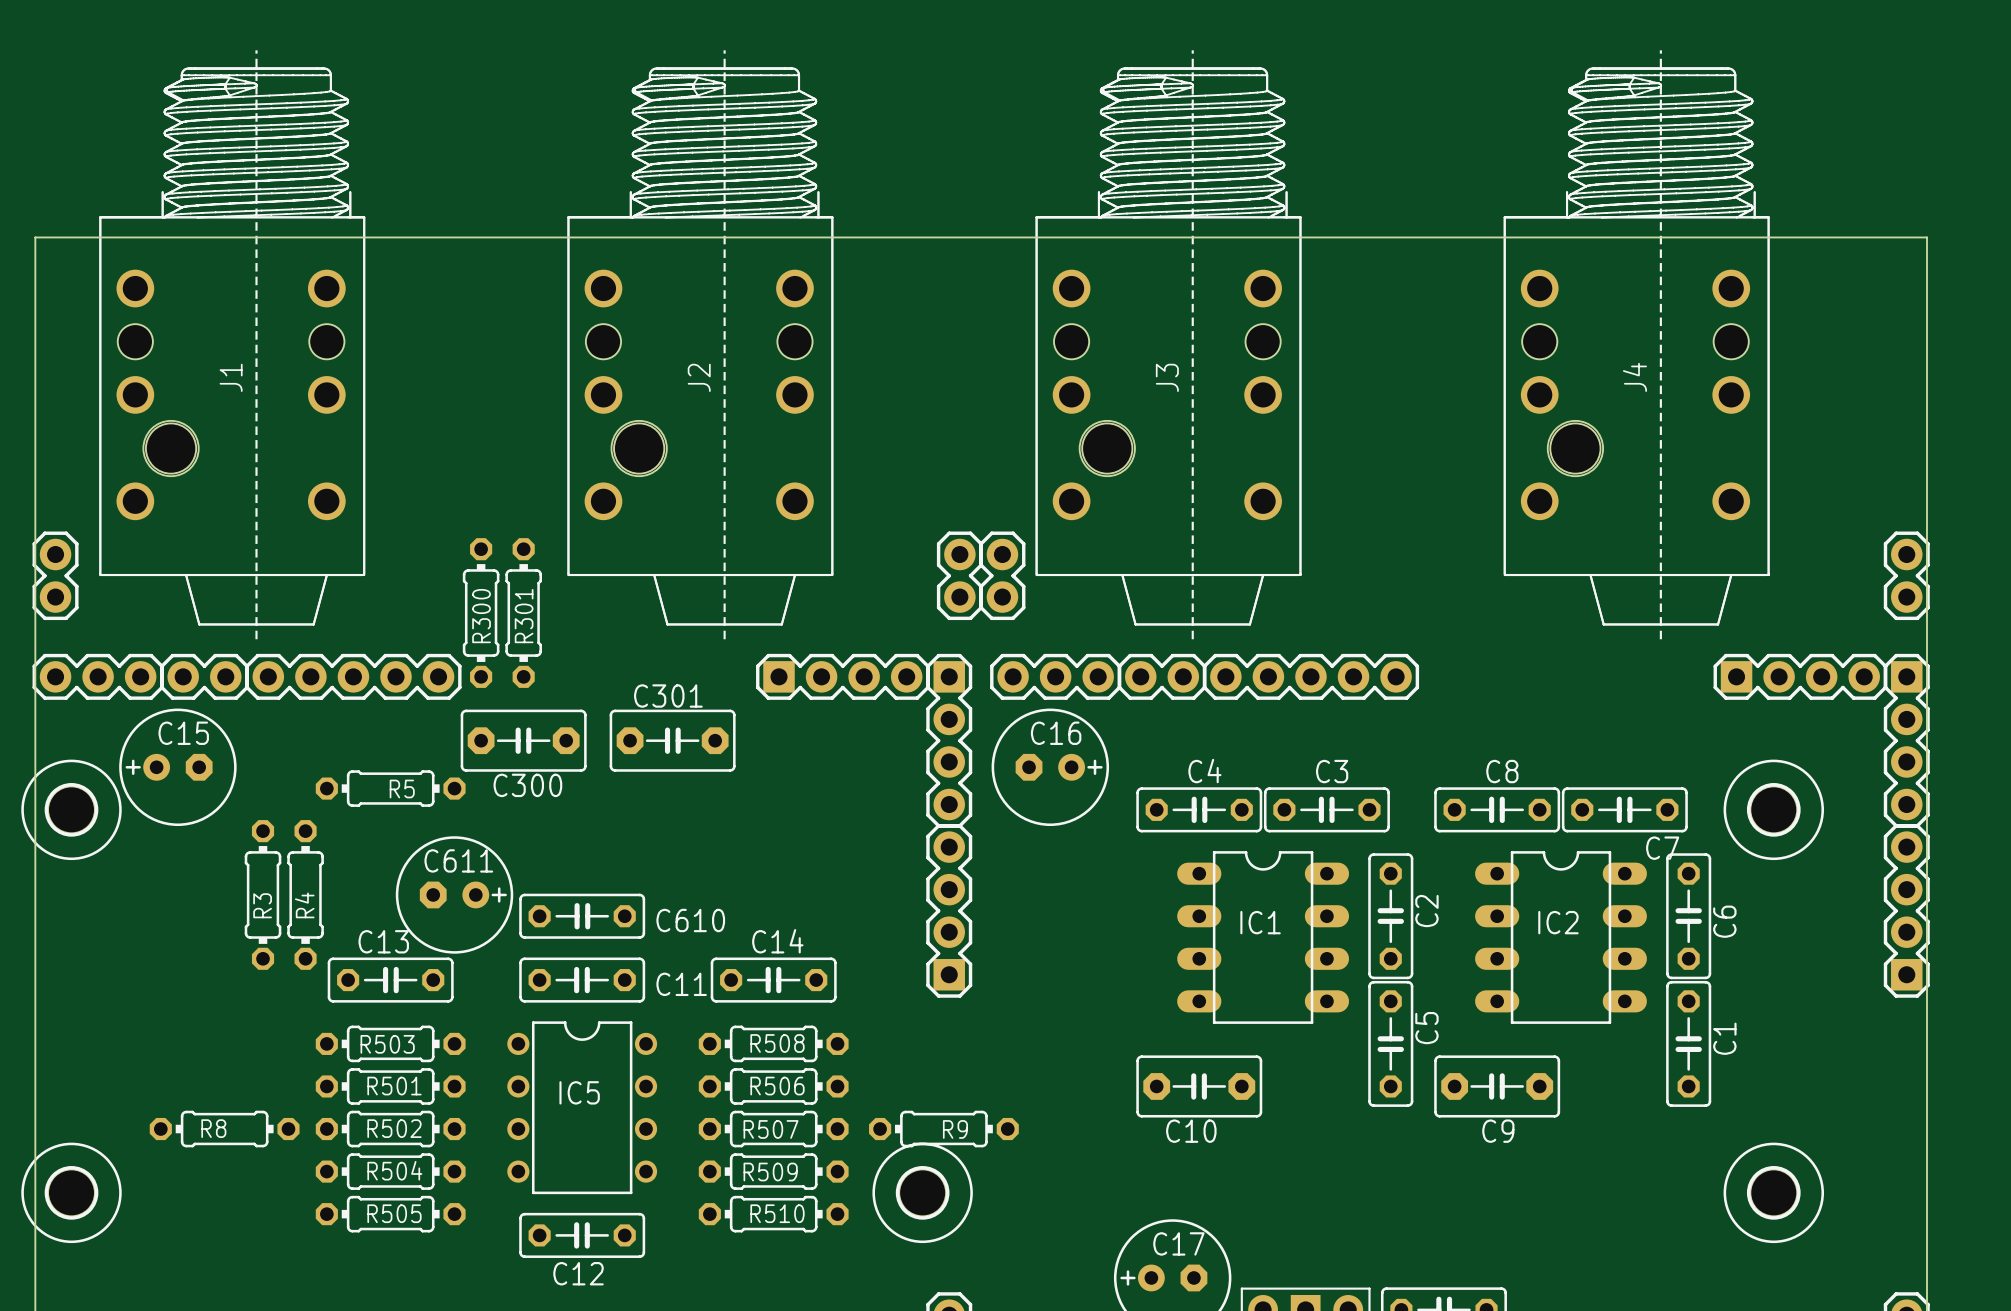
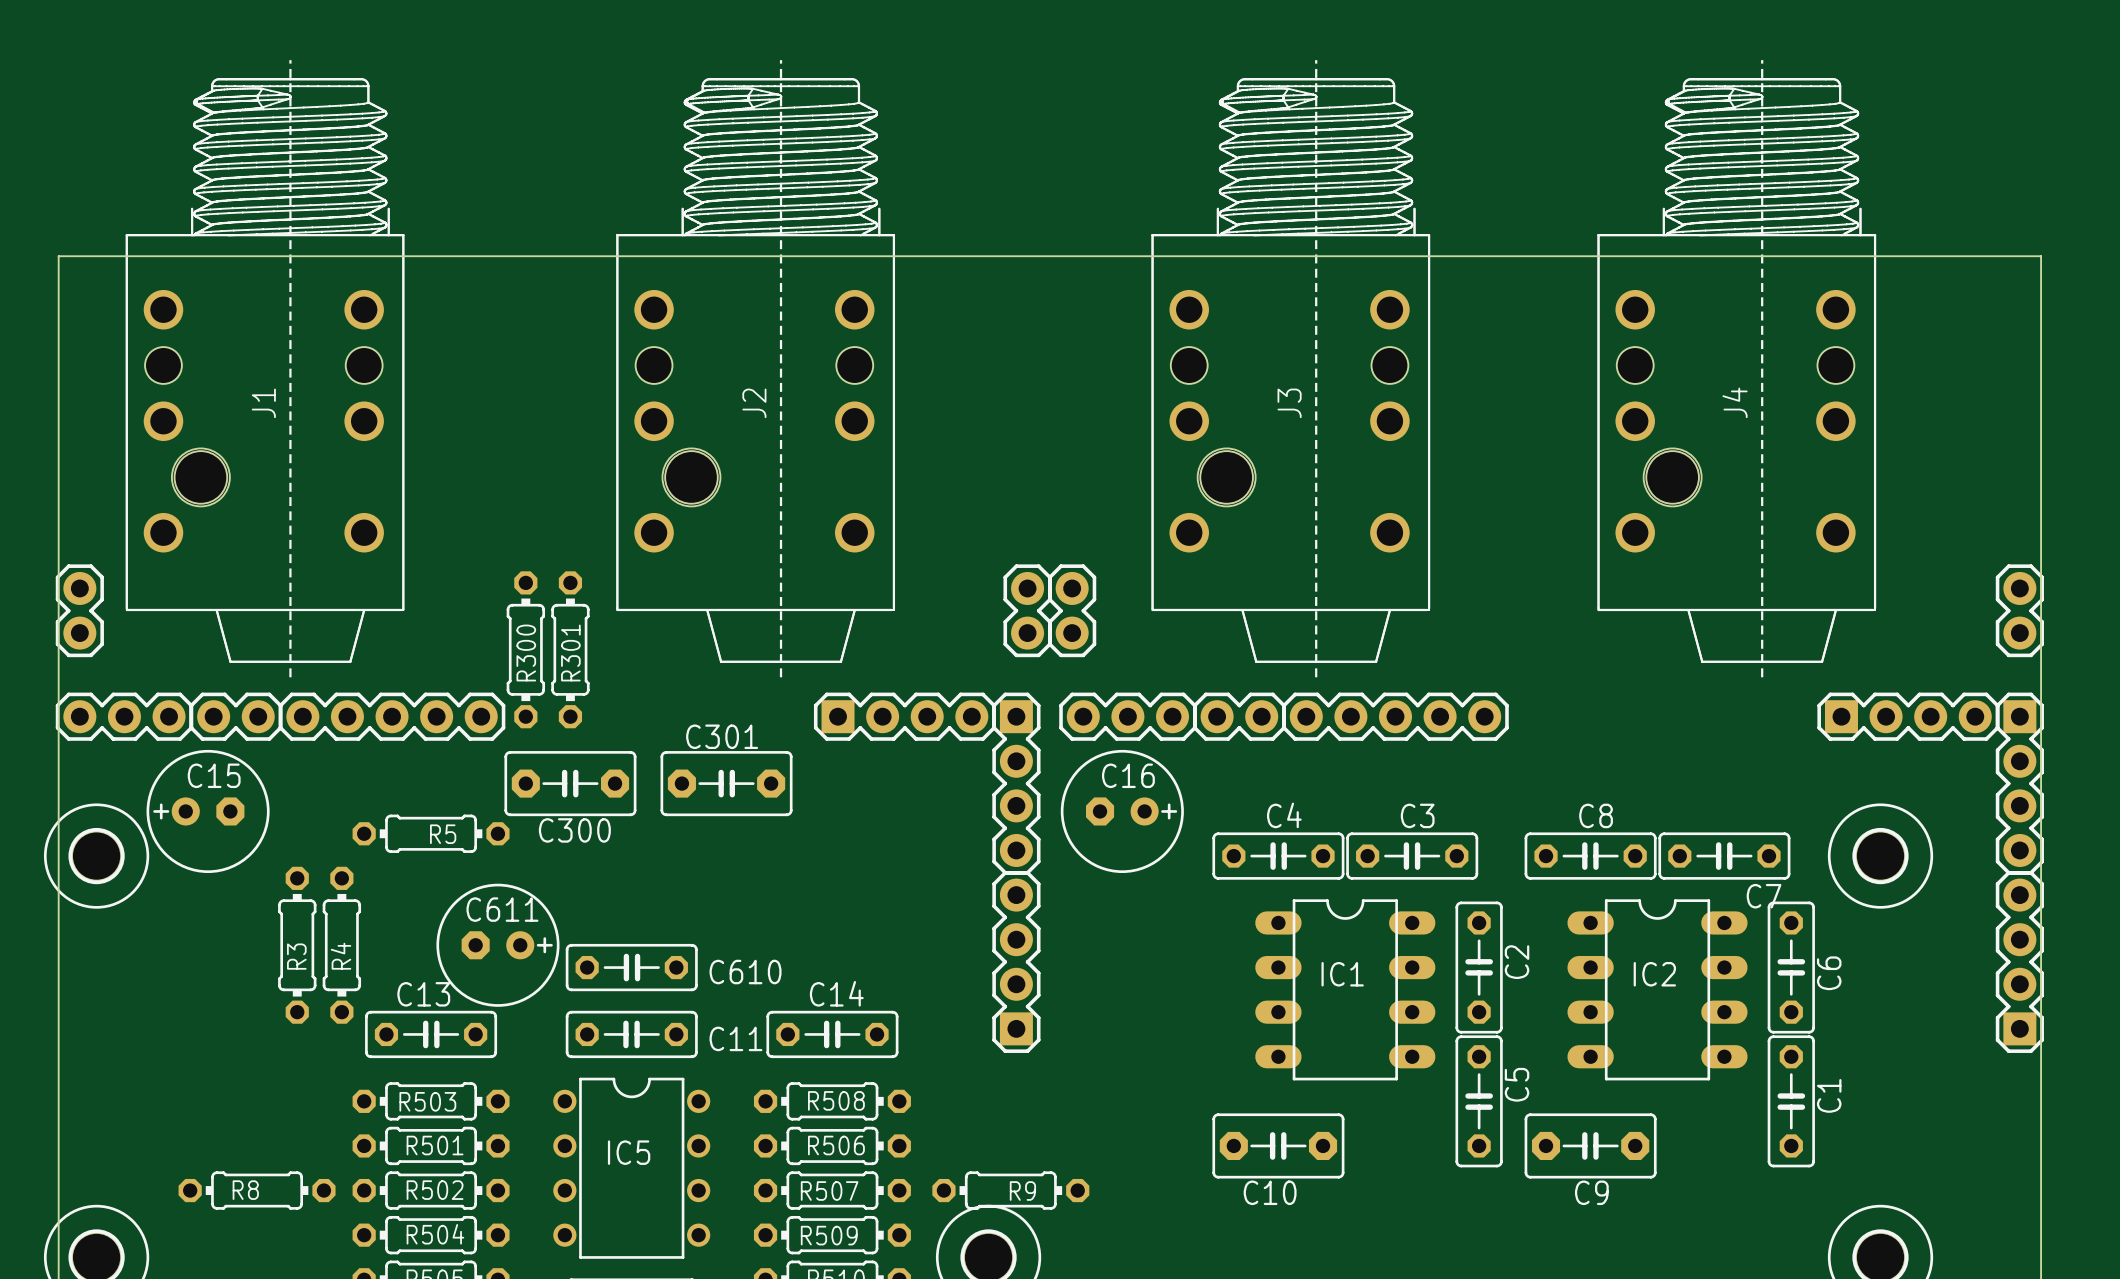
J3 position: (1168, 344) -> (1290, 368)

